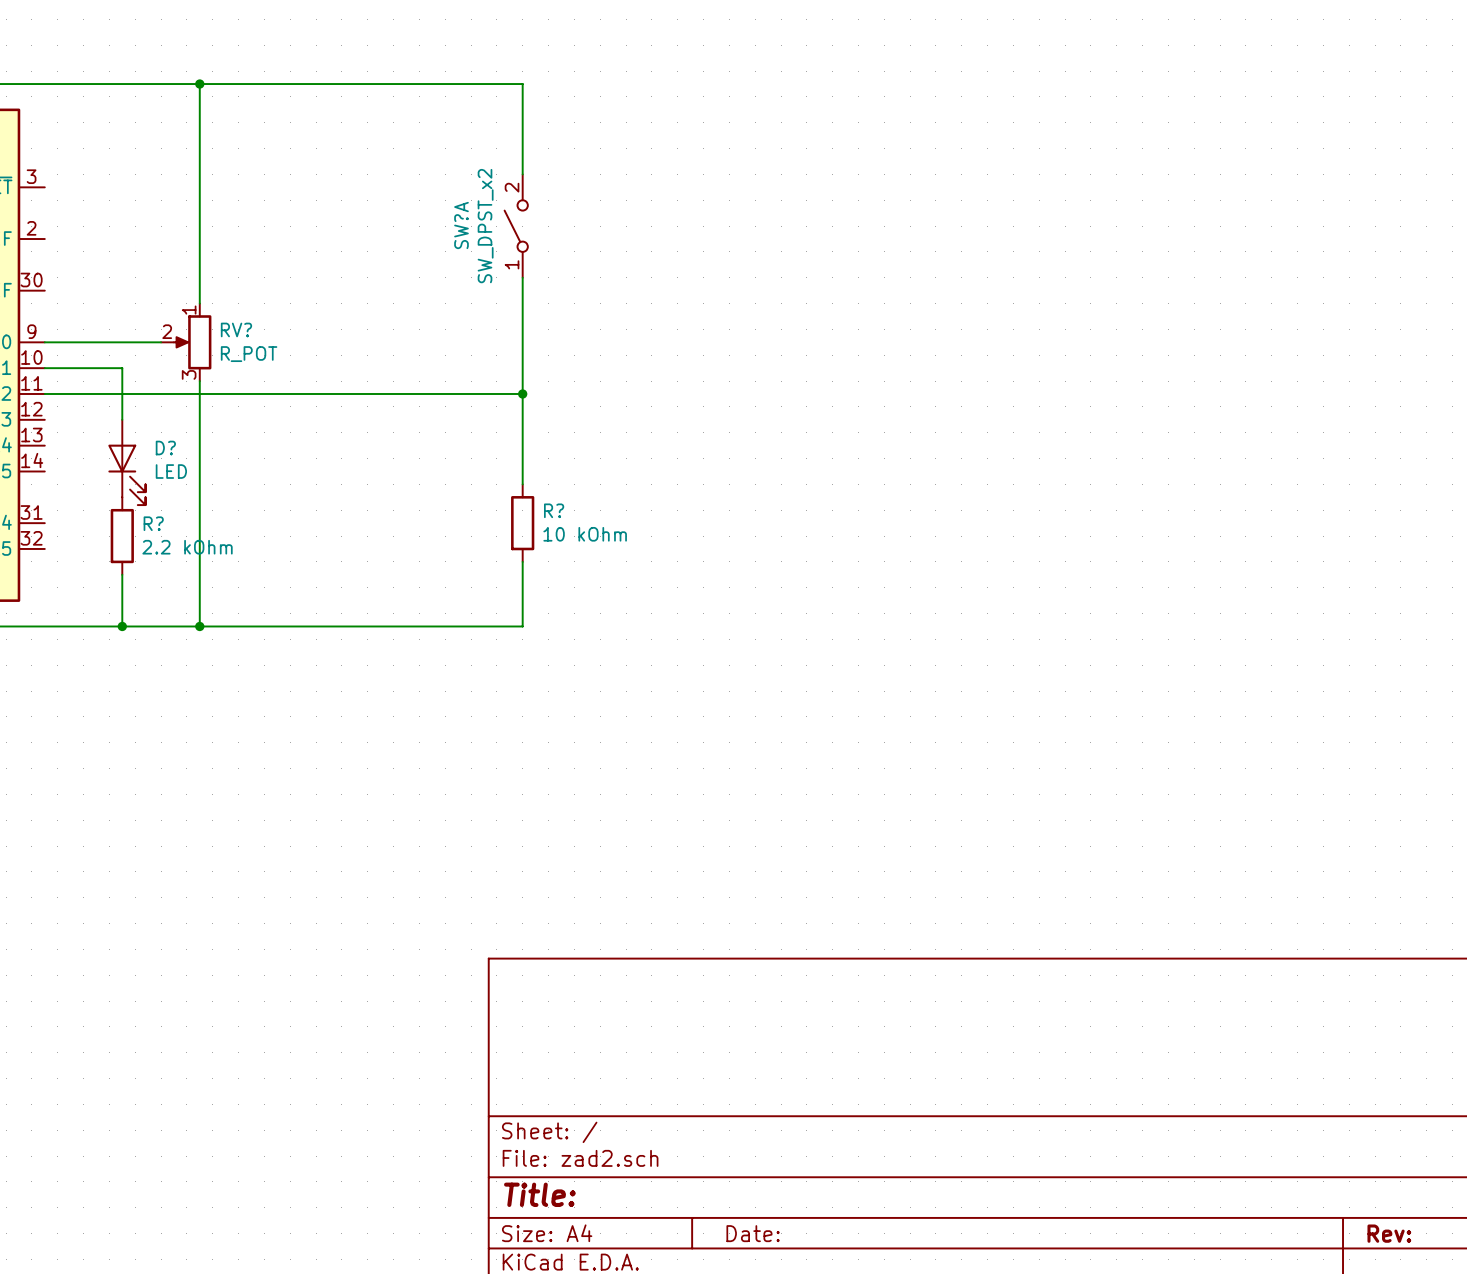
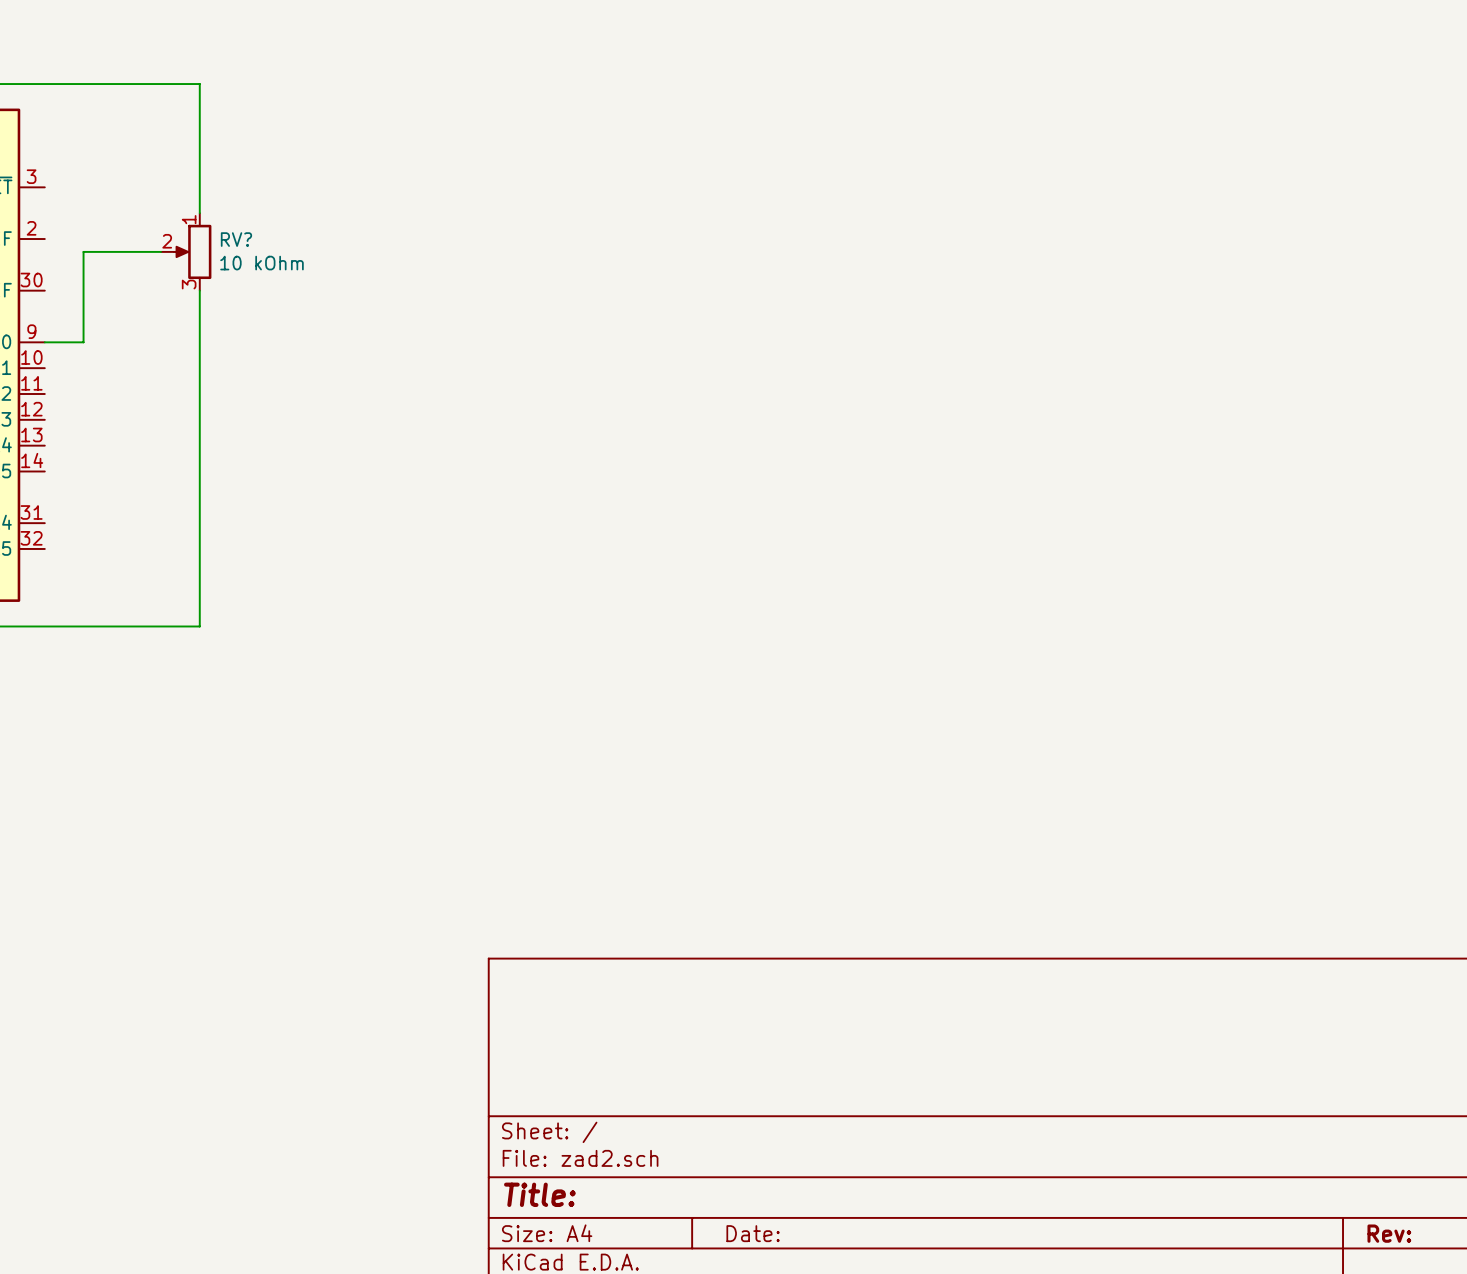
wire: (199, 84) (522, 84) (522, 174) -> none
junction: (199, 84) -> none
wire: (199, 213) (199, 290) -> (199, 303) (199, 381)
SW?A: SW_DPST_x2 (516, 226) -> none
RV?: none -> 10 kOhm (186, 251)
wire: (522, 277) (522, 484) -> none
wire: (83, 342) (161, 342) -> (83, 342) (83, 251) (161, 251)
RV?: R_POT (186, 342) -> none
wire: (44, 368) (122, 368) (122, 419) -> none
wire: (44, 393) (522, 393) -> none
junction: (522, 393) -> none
D?: LED (126, 462) -> none
R?: 10 kOhm (522, 523) -> none
R?: 2.2 kOhm (122, 536) -> none
wire: (522, 561) (522, 626) (199, 626) -> none
wire: (122, 574) (122, 626) -> none
junction: (122, 626) -> none
junction: (199, 626) -> none

